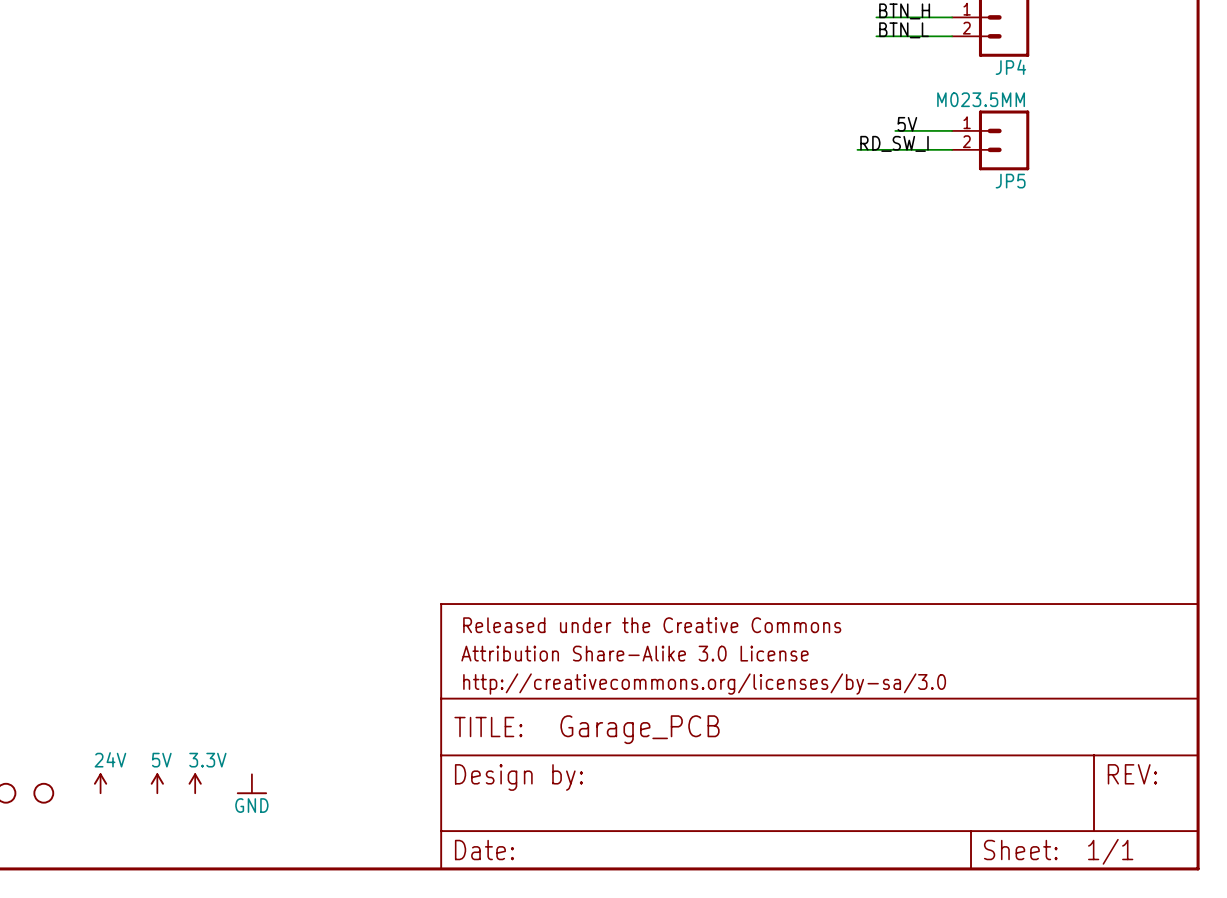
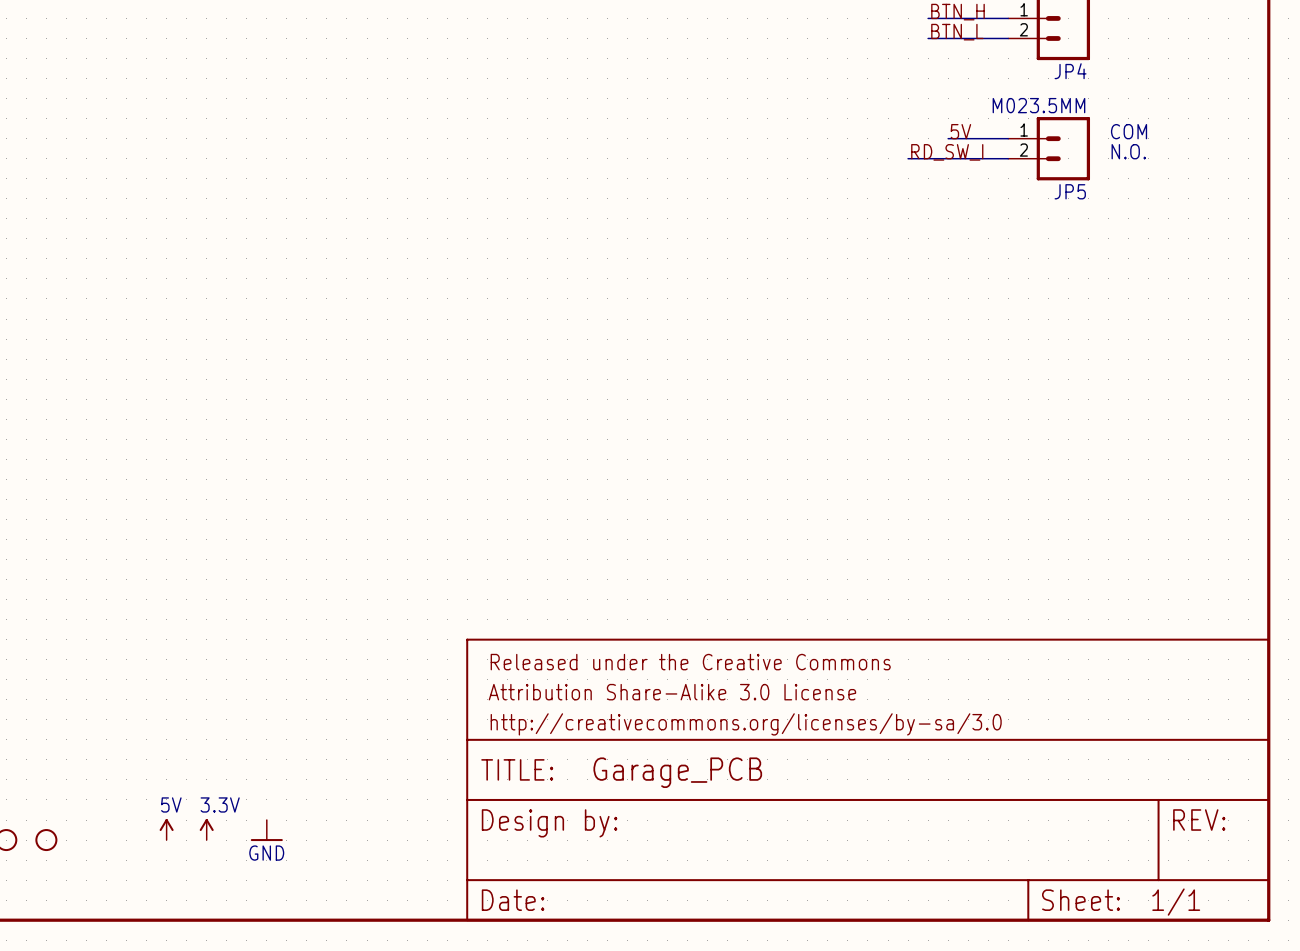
text: none -> COM (1129, 131)
text: none -> N.O. (1128, 151)
power symbol: 24V (100, 783) -> none

